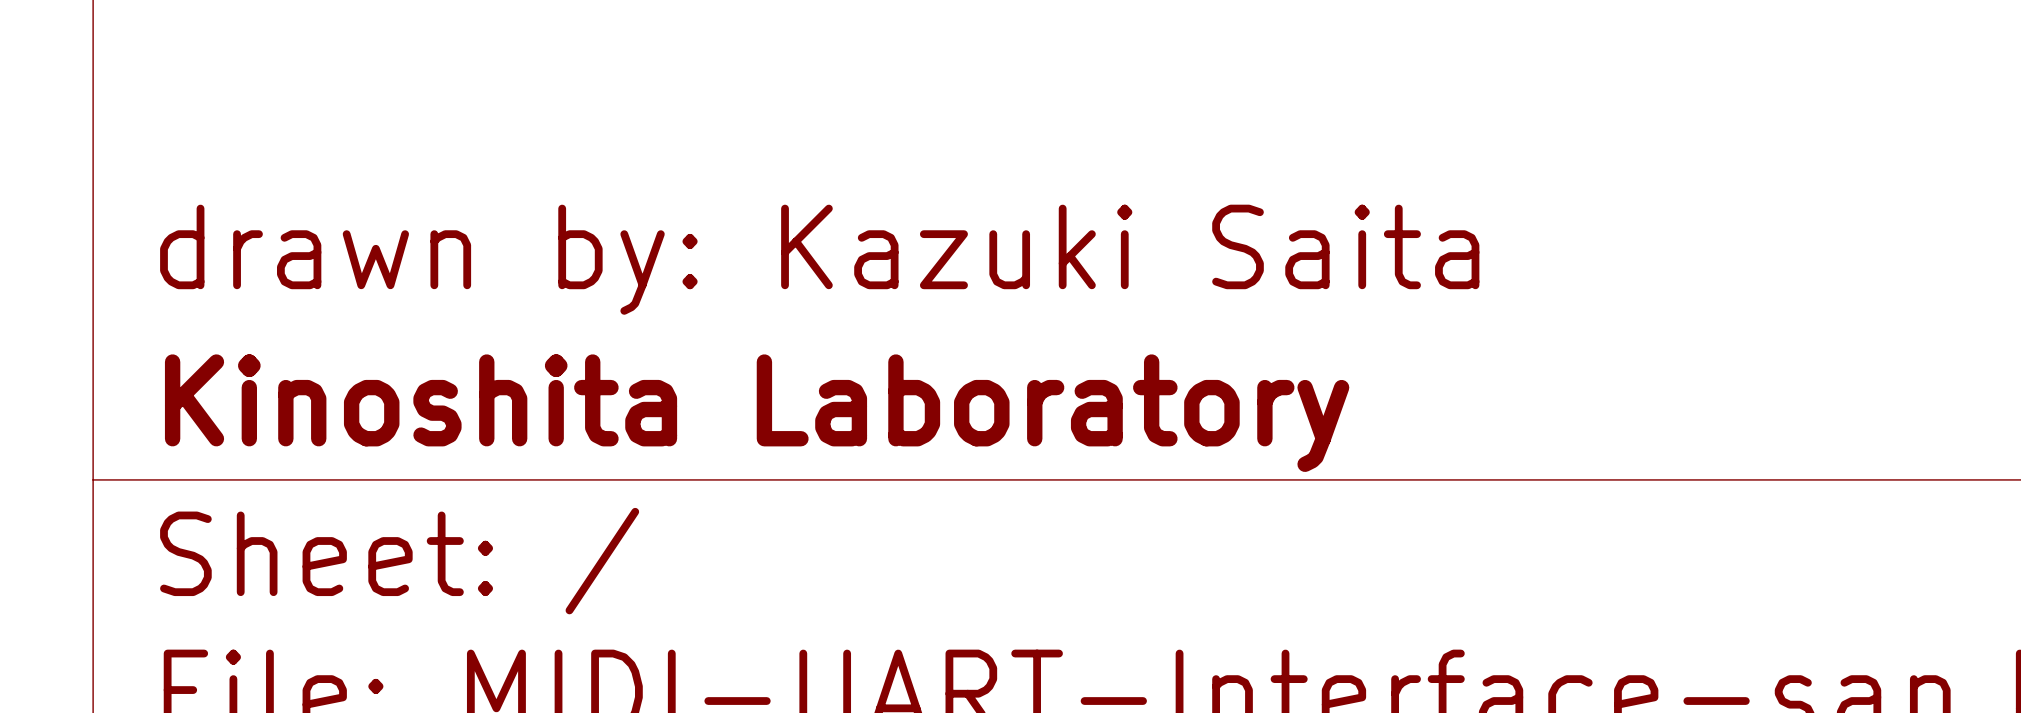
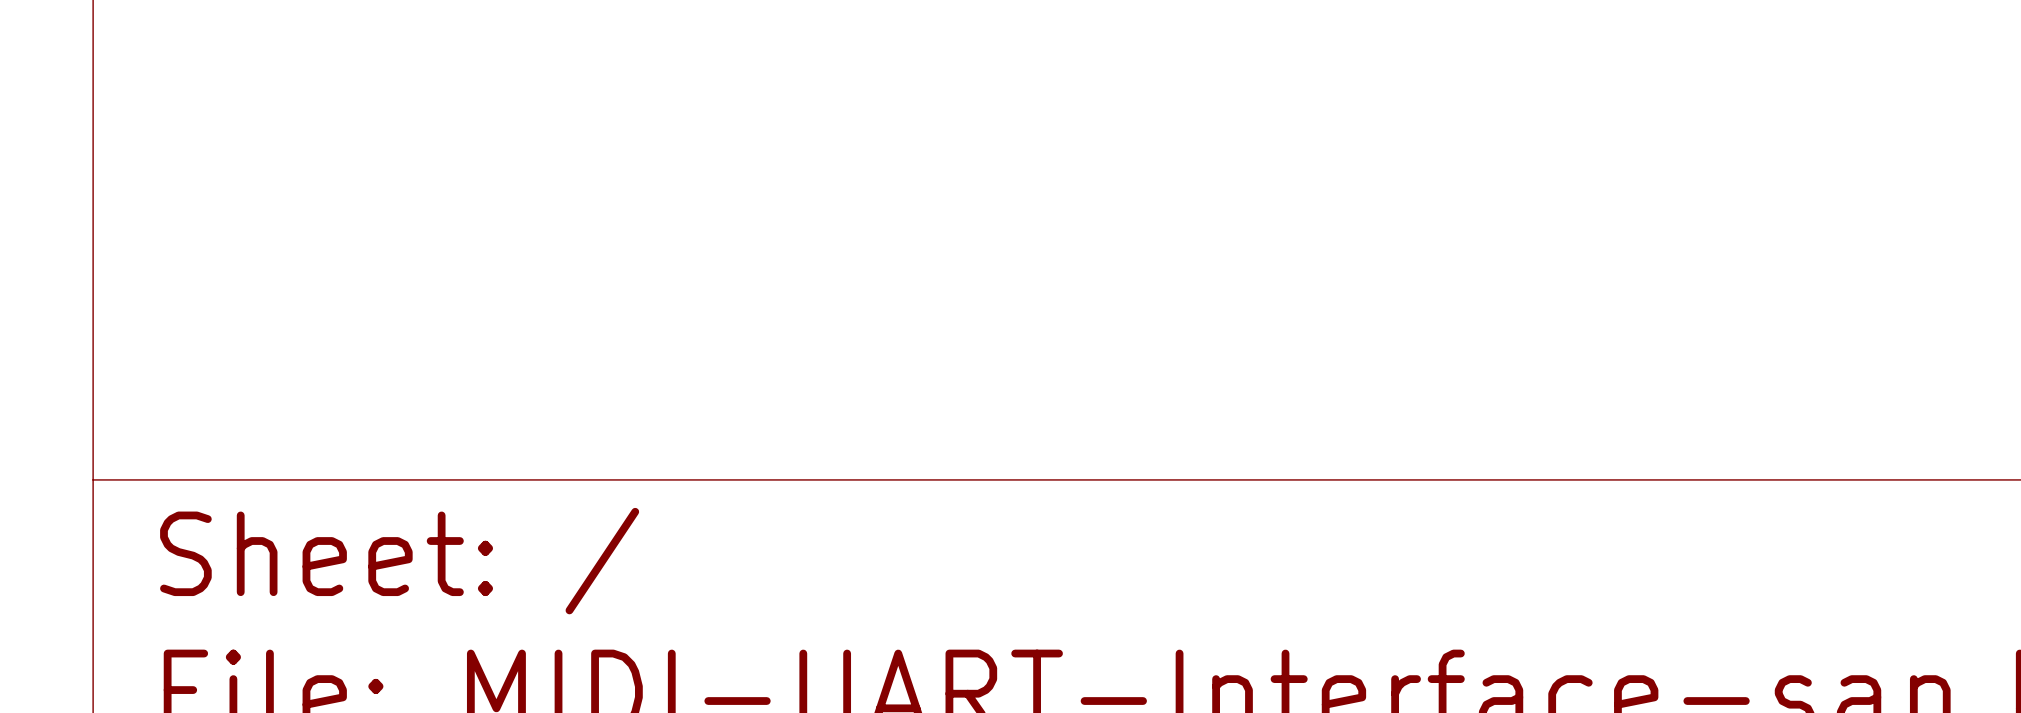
title block: drawn by: Kazuki Saita (819, 259) -> none
title block: Kinoshita Laboratory (757, 413) -> none

